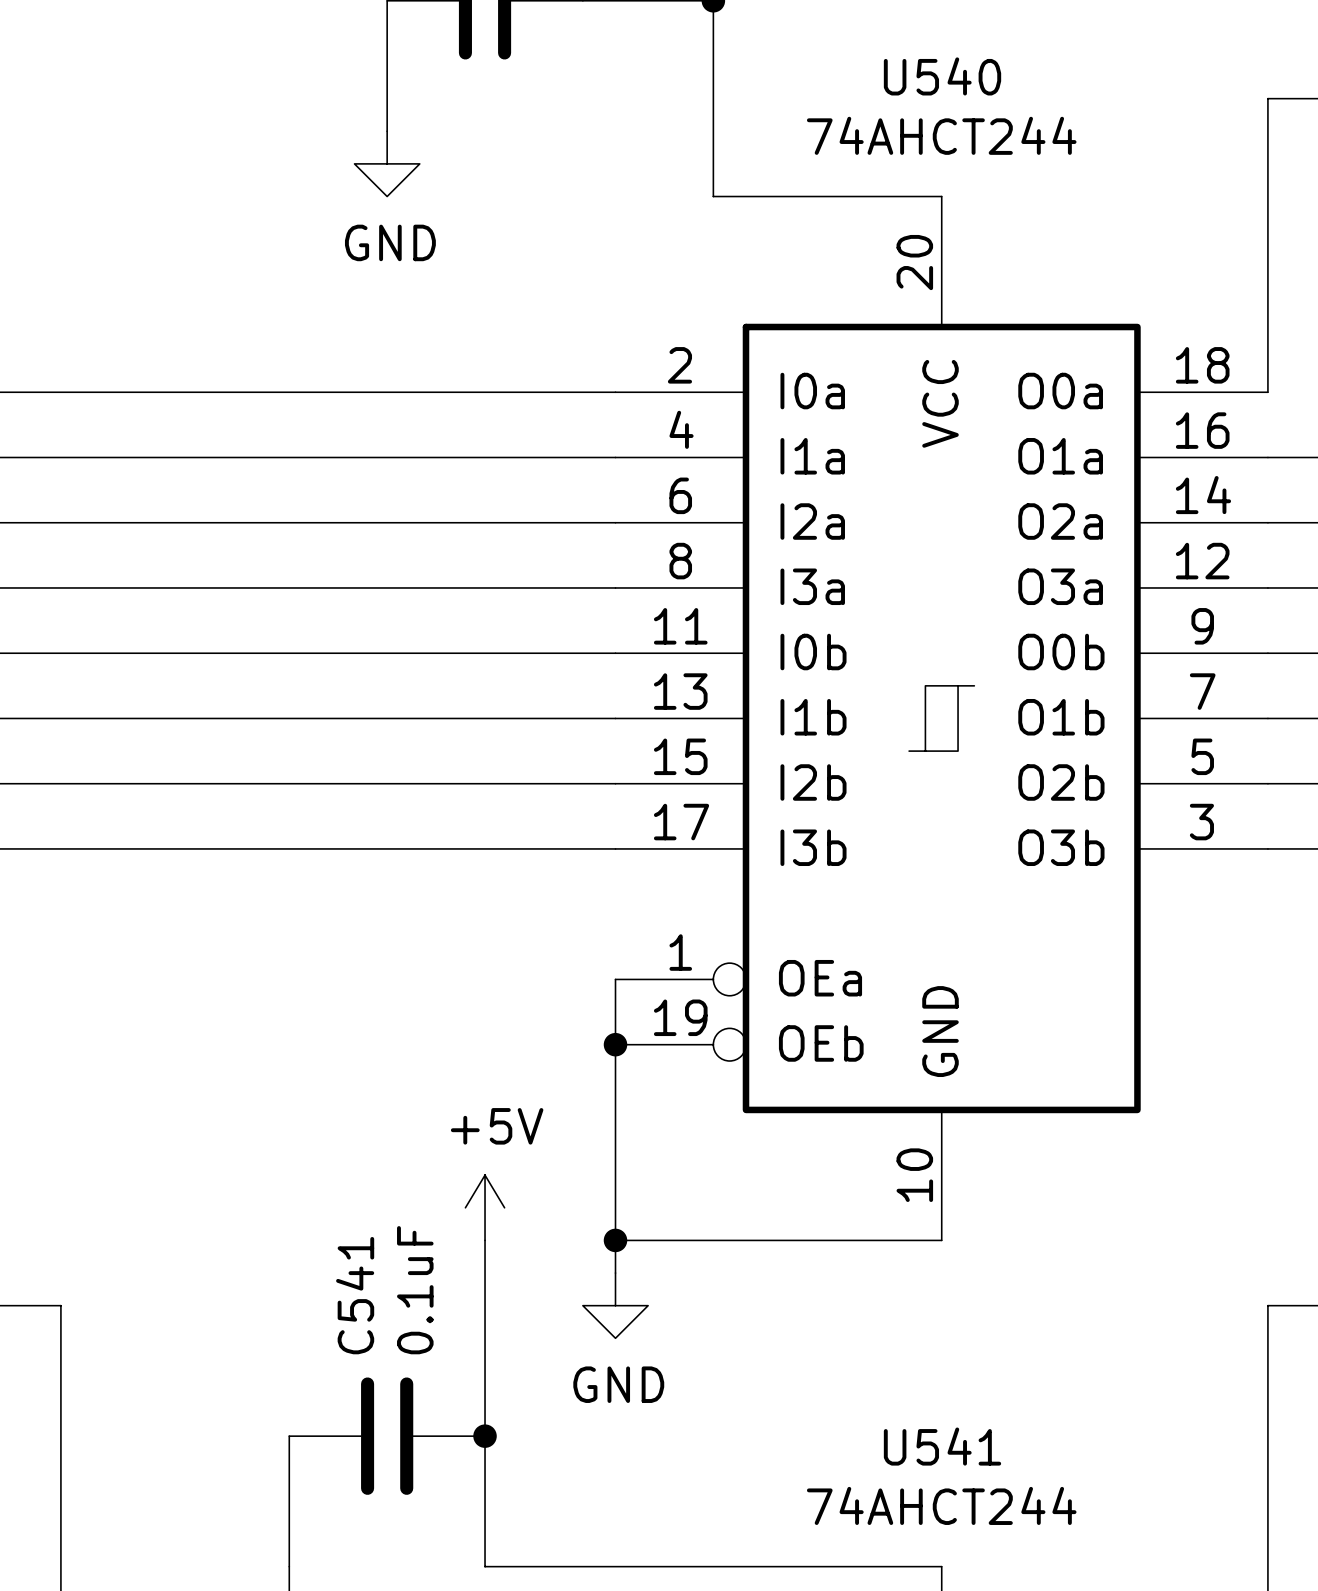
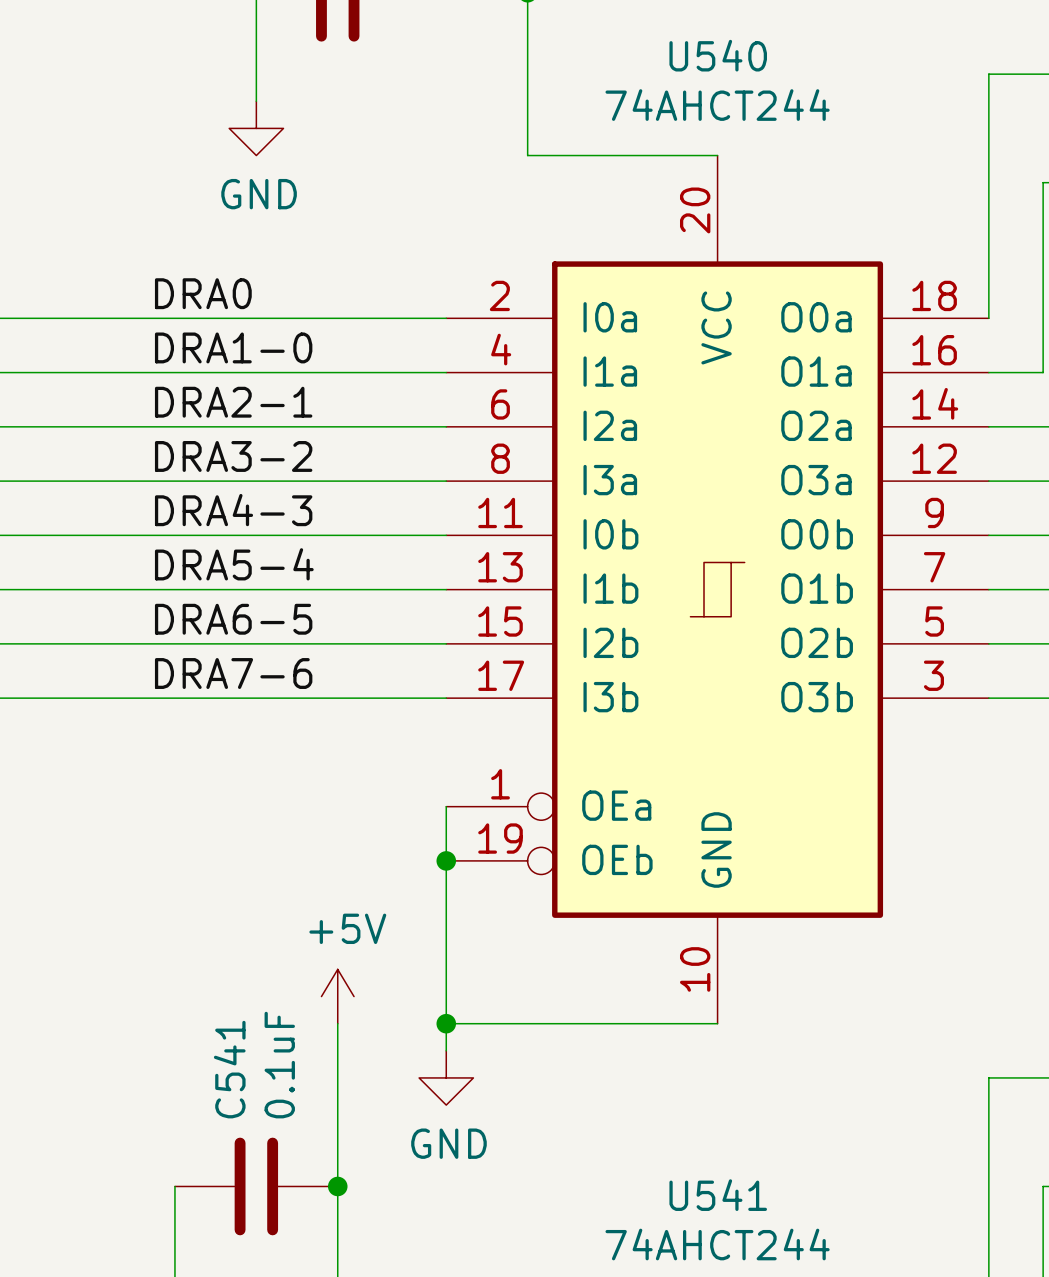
label: none -> DRA0 (203, 293)
label: none -> DRA1-0 (233, 347)
label: none -> DRA2-1 (233, 402)
label: none -> DRA3-2 (233, 456)
label: none -> DRA4-3 (233, 510)
label: none -> DRA5-4 (234, 564)
label: none -> DRA6-5 (233, 619)
label: none -> DRA7-6 (233, 673)

